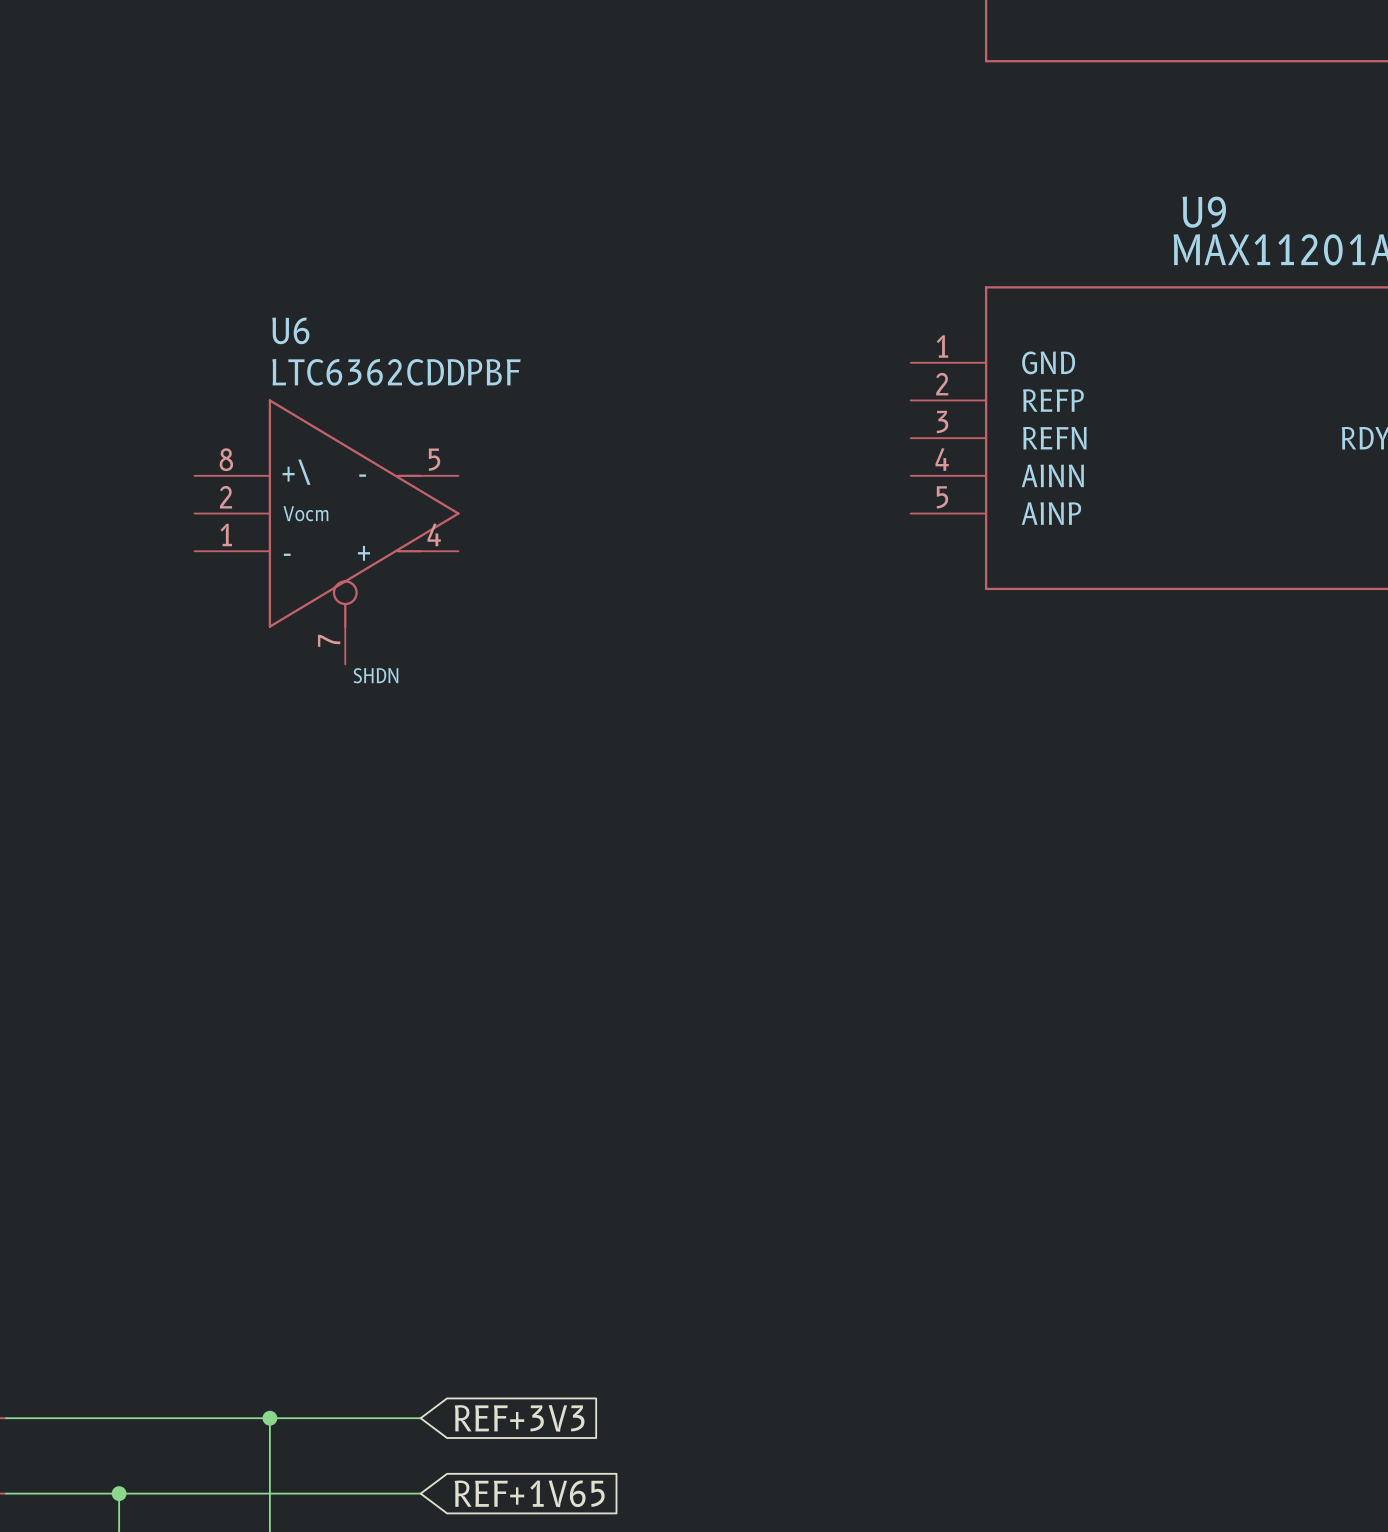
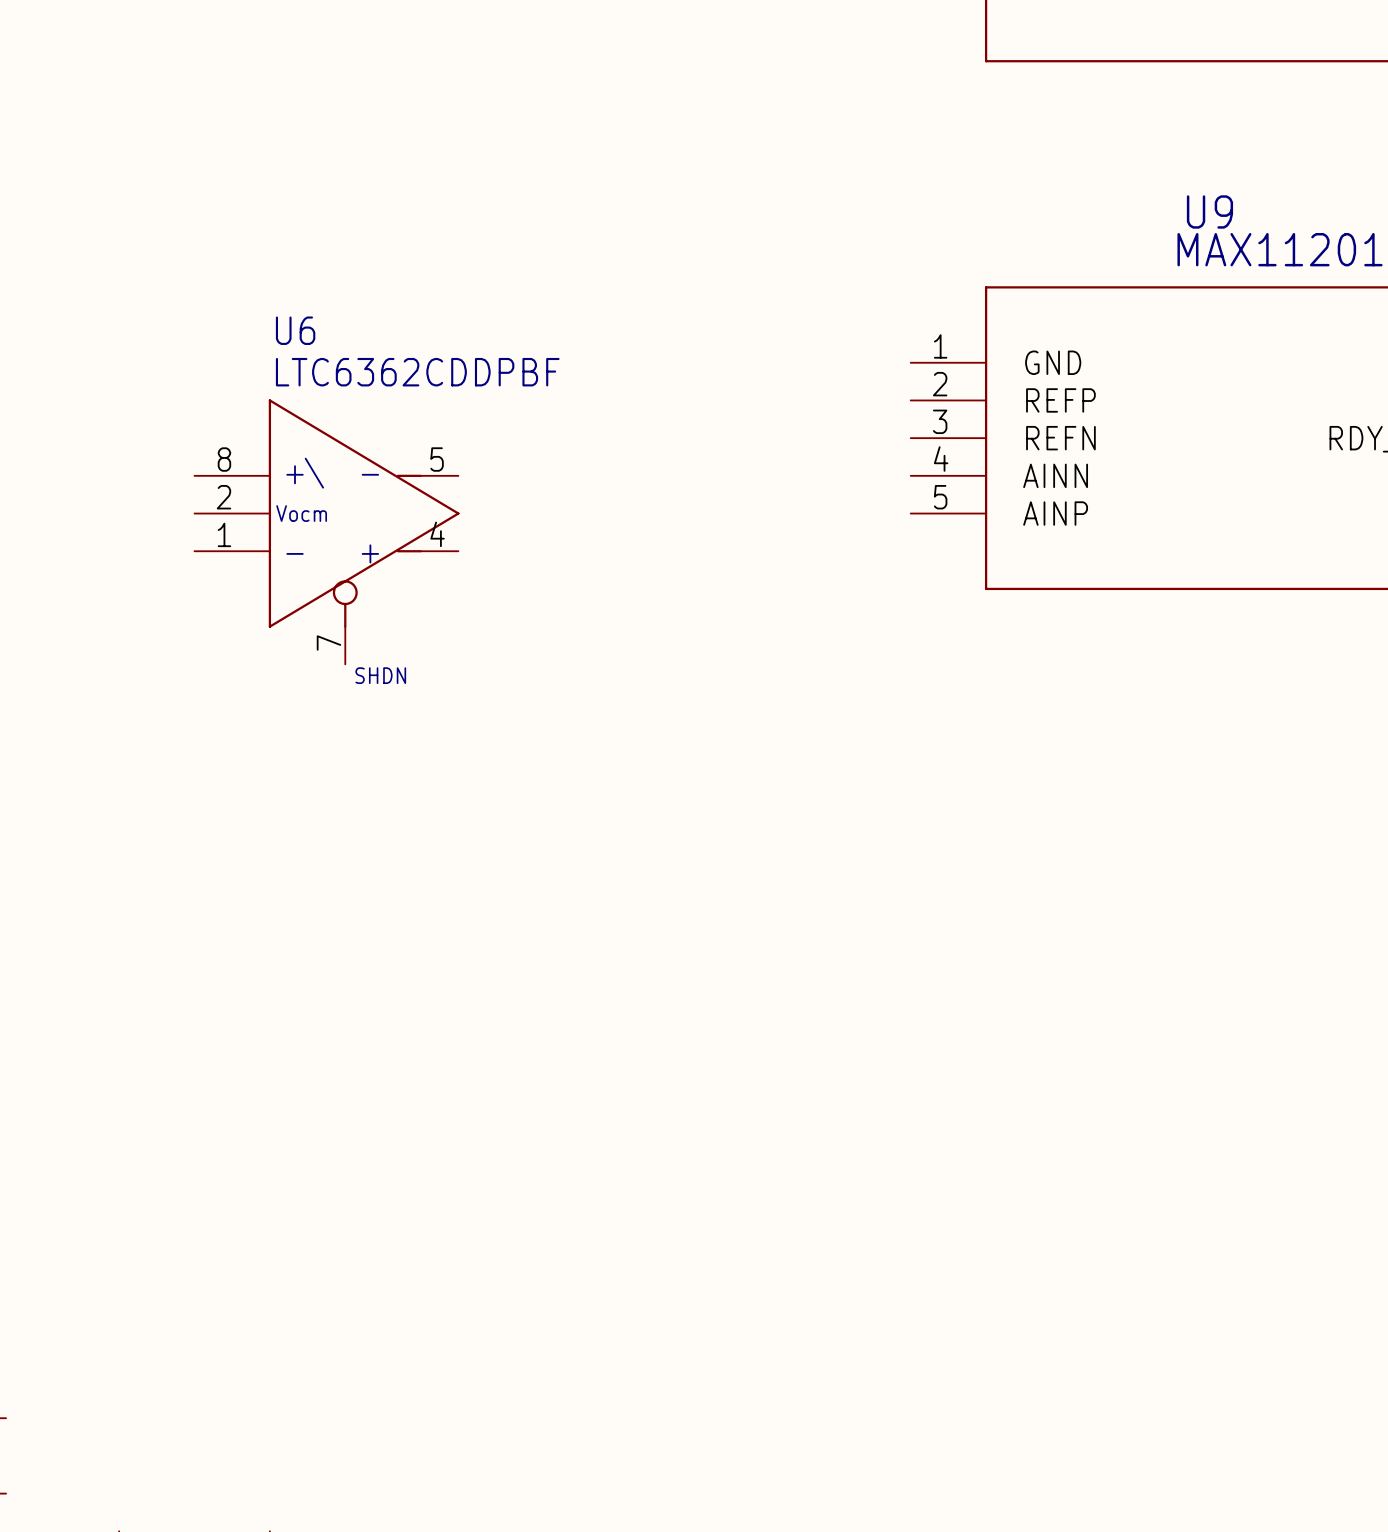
wire: (6, 1418) (420, 1418) -> none
wire: (269, 1418) (269, 1531) -> none
junction: (269, 1418) -> none
global label: REF+3V3 (519, 1418) -> none
wire: (6, 1493) (420, 1493) -> none
wire: (119, 1493) (119, 1531) -> none
junction: (119, 1493) -> none
global label: REF+1V65 (529, 1493) -> none

